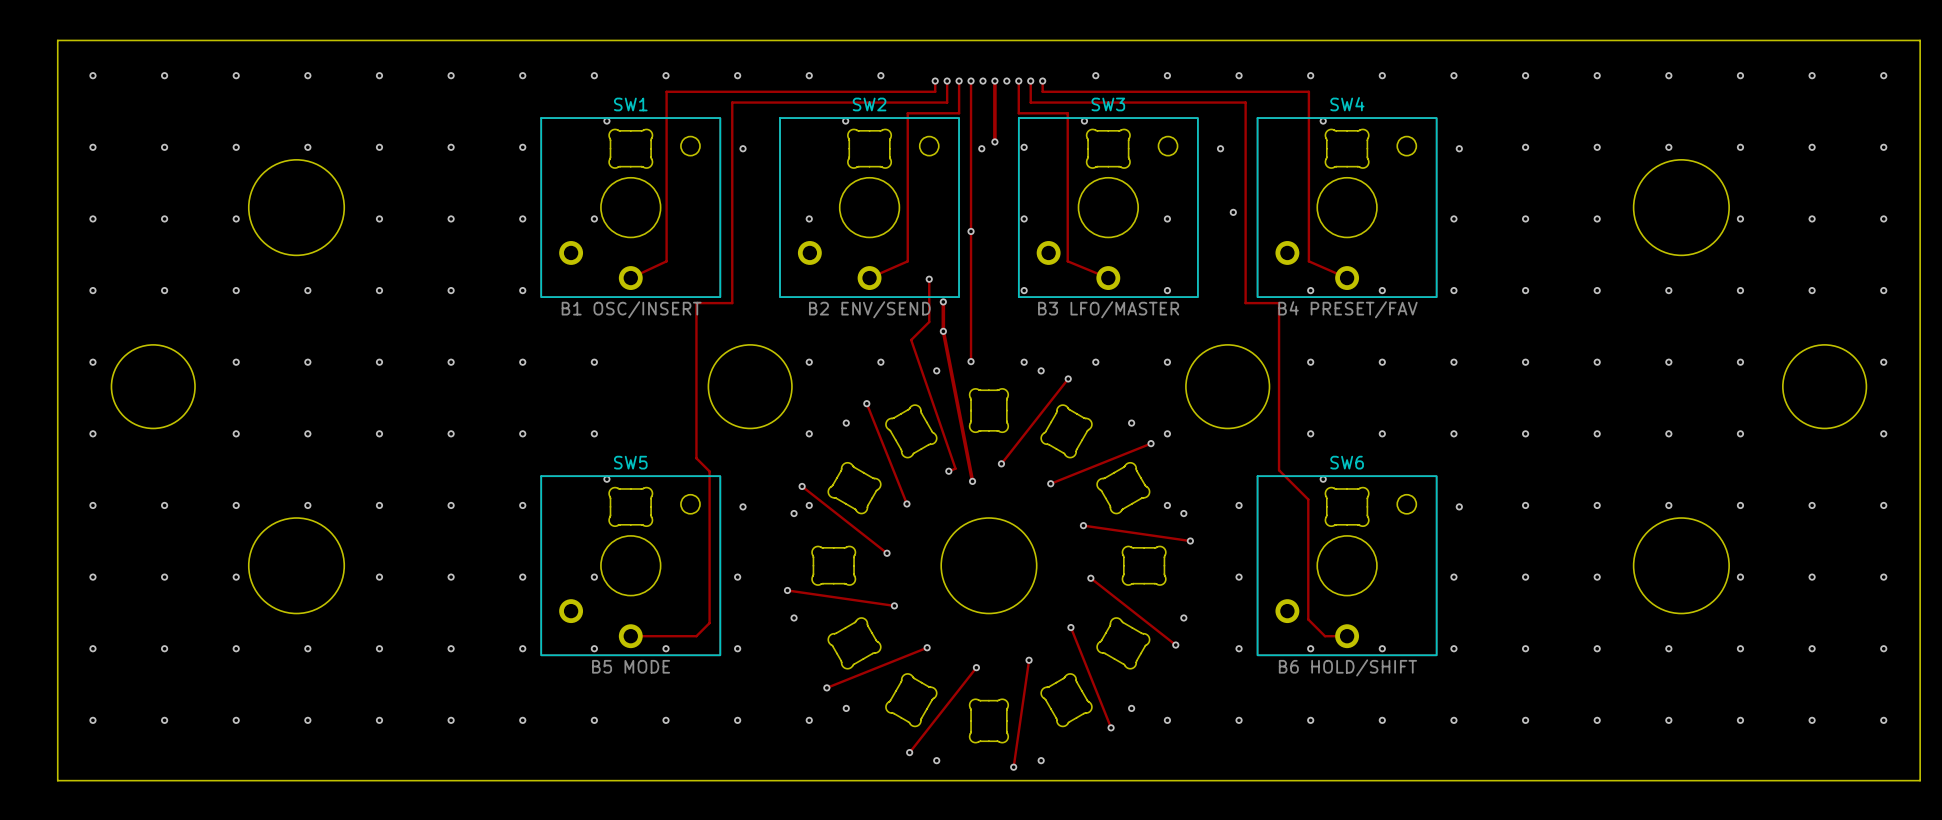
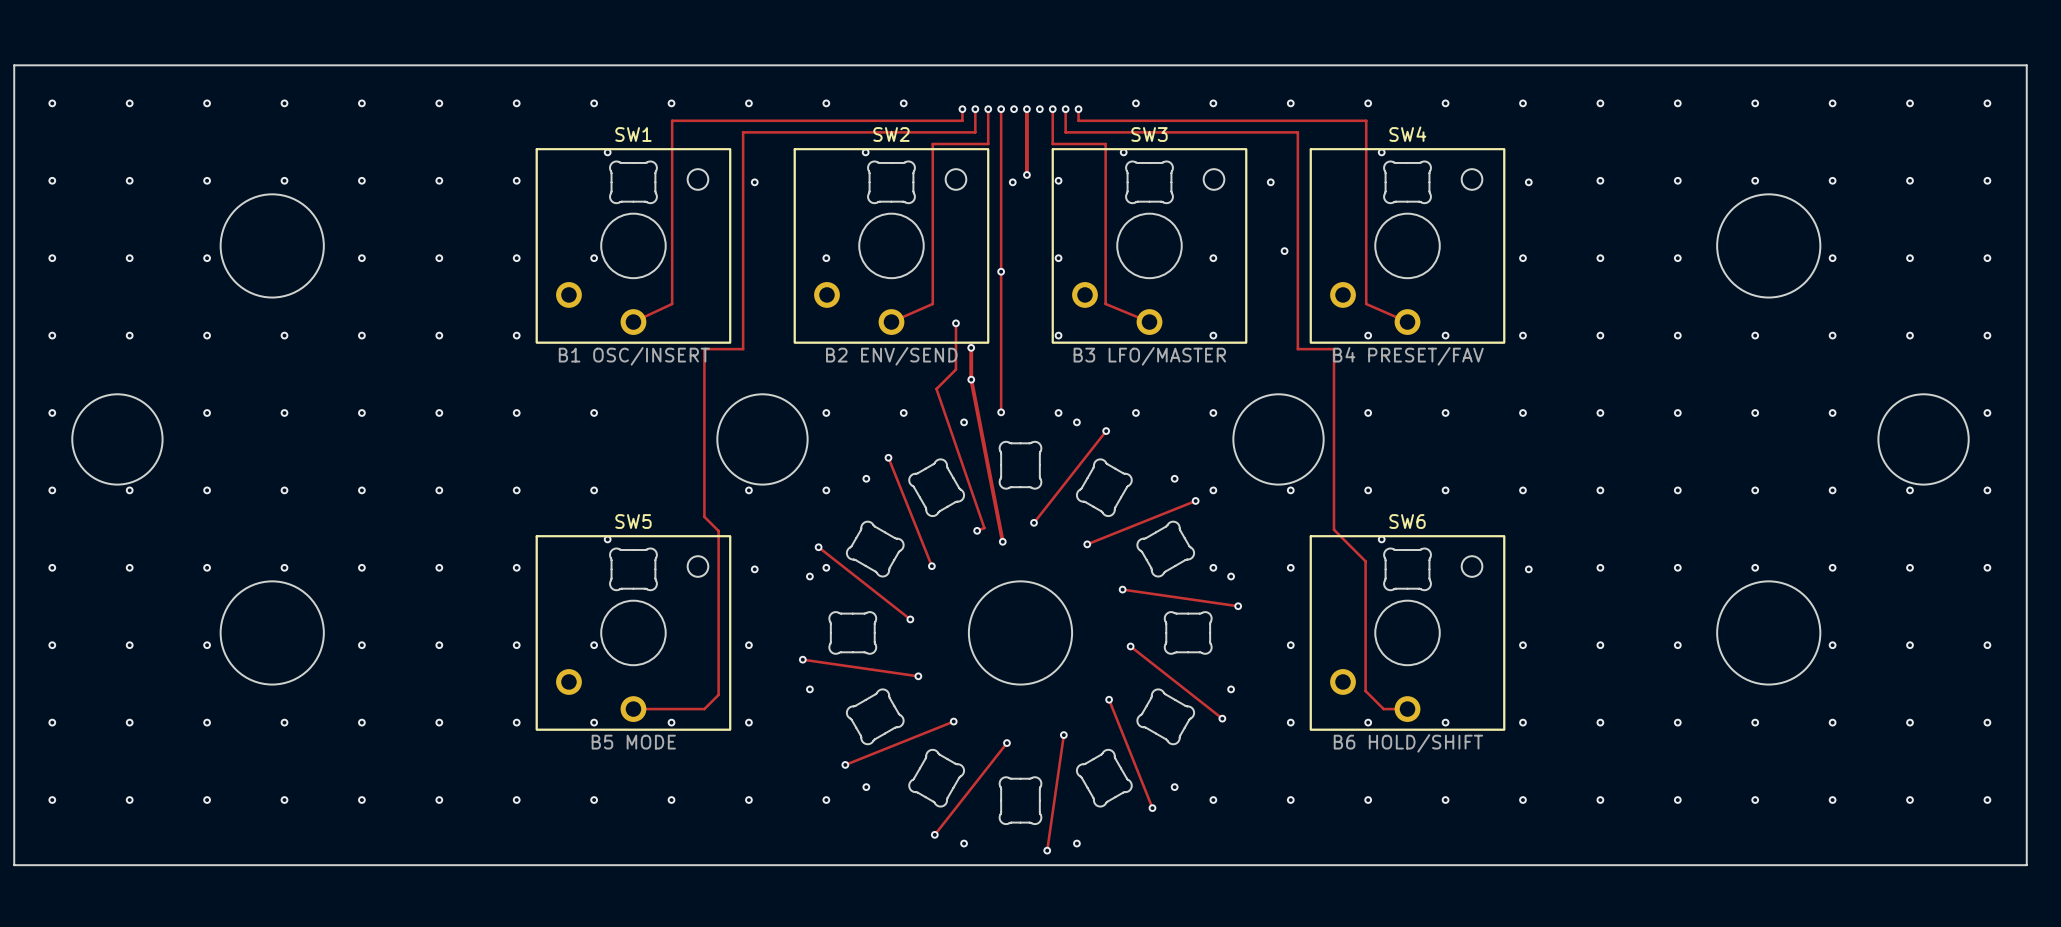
via: none -> (129, 490)
via: none -> (748, 490)
via: none -> (1290, 490)
via: none -> (1910, 490)

